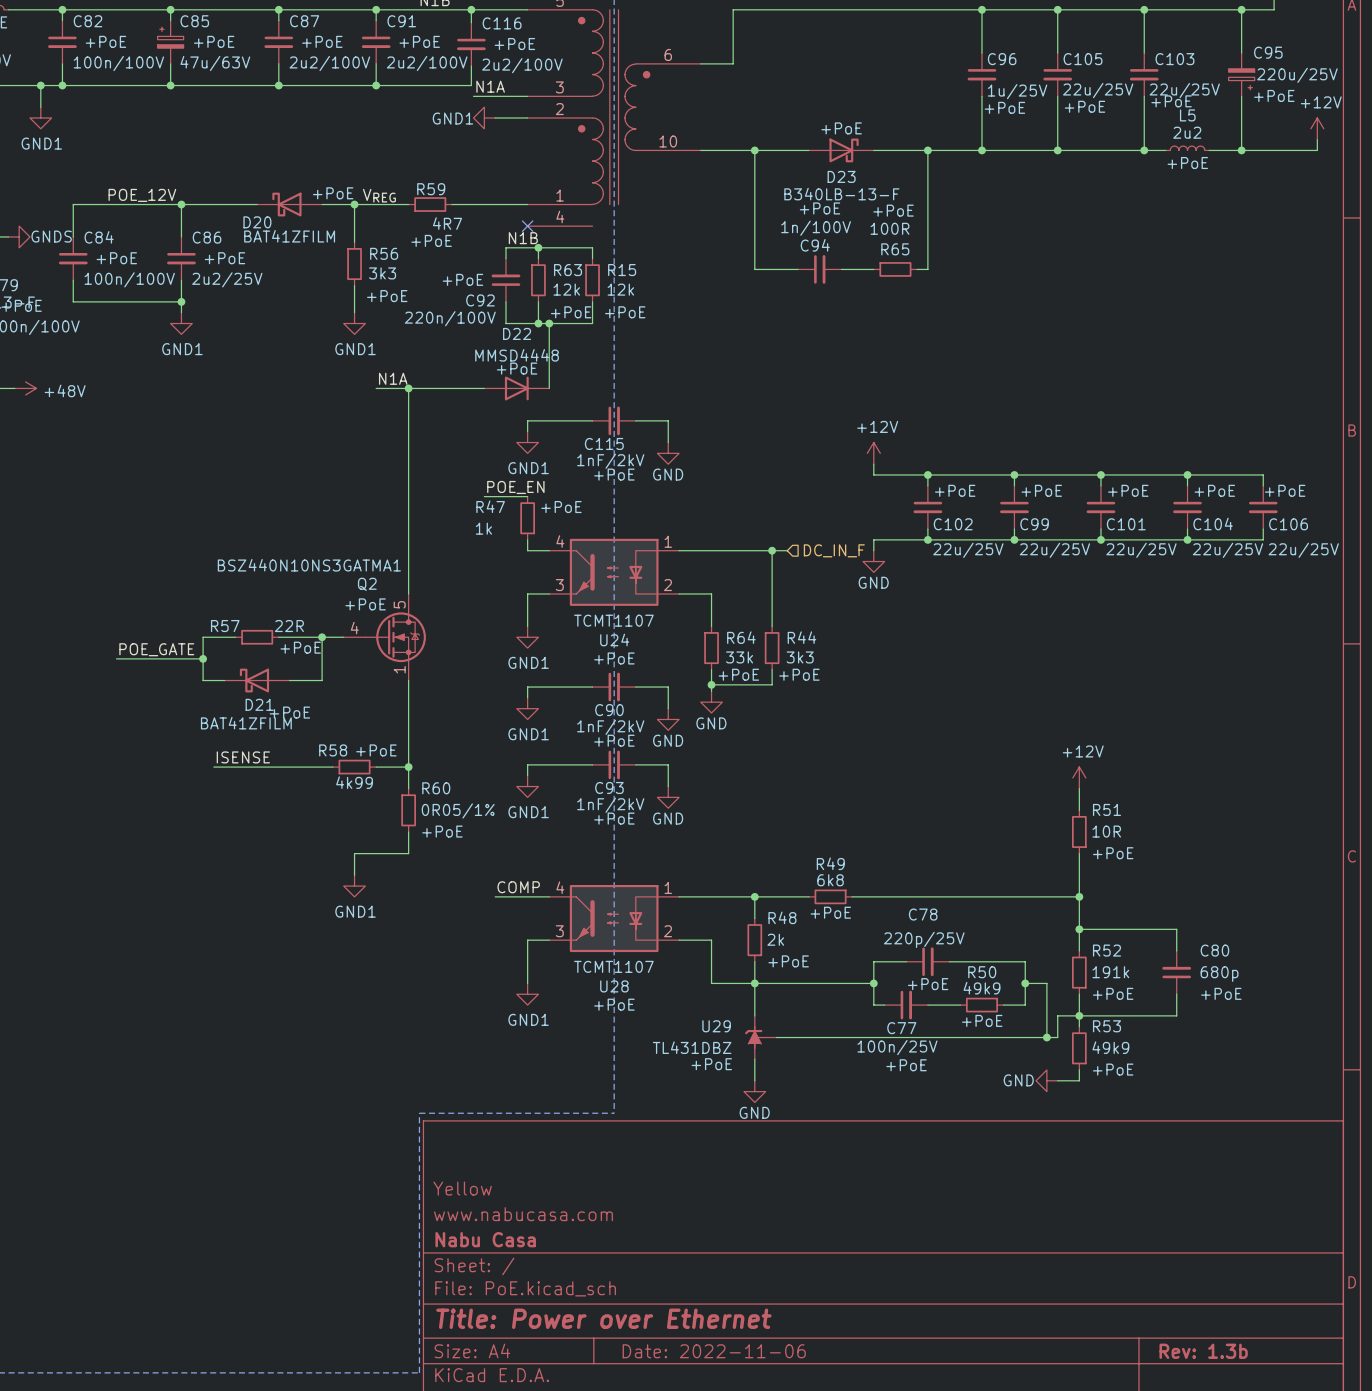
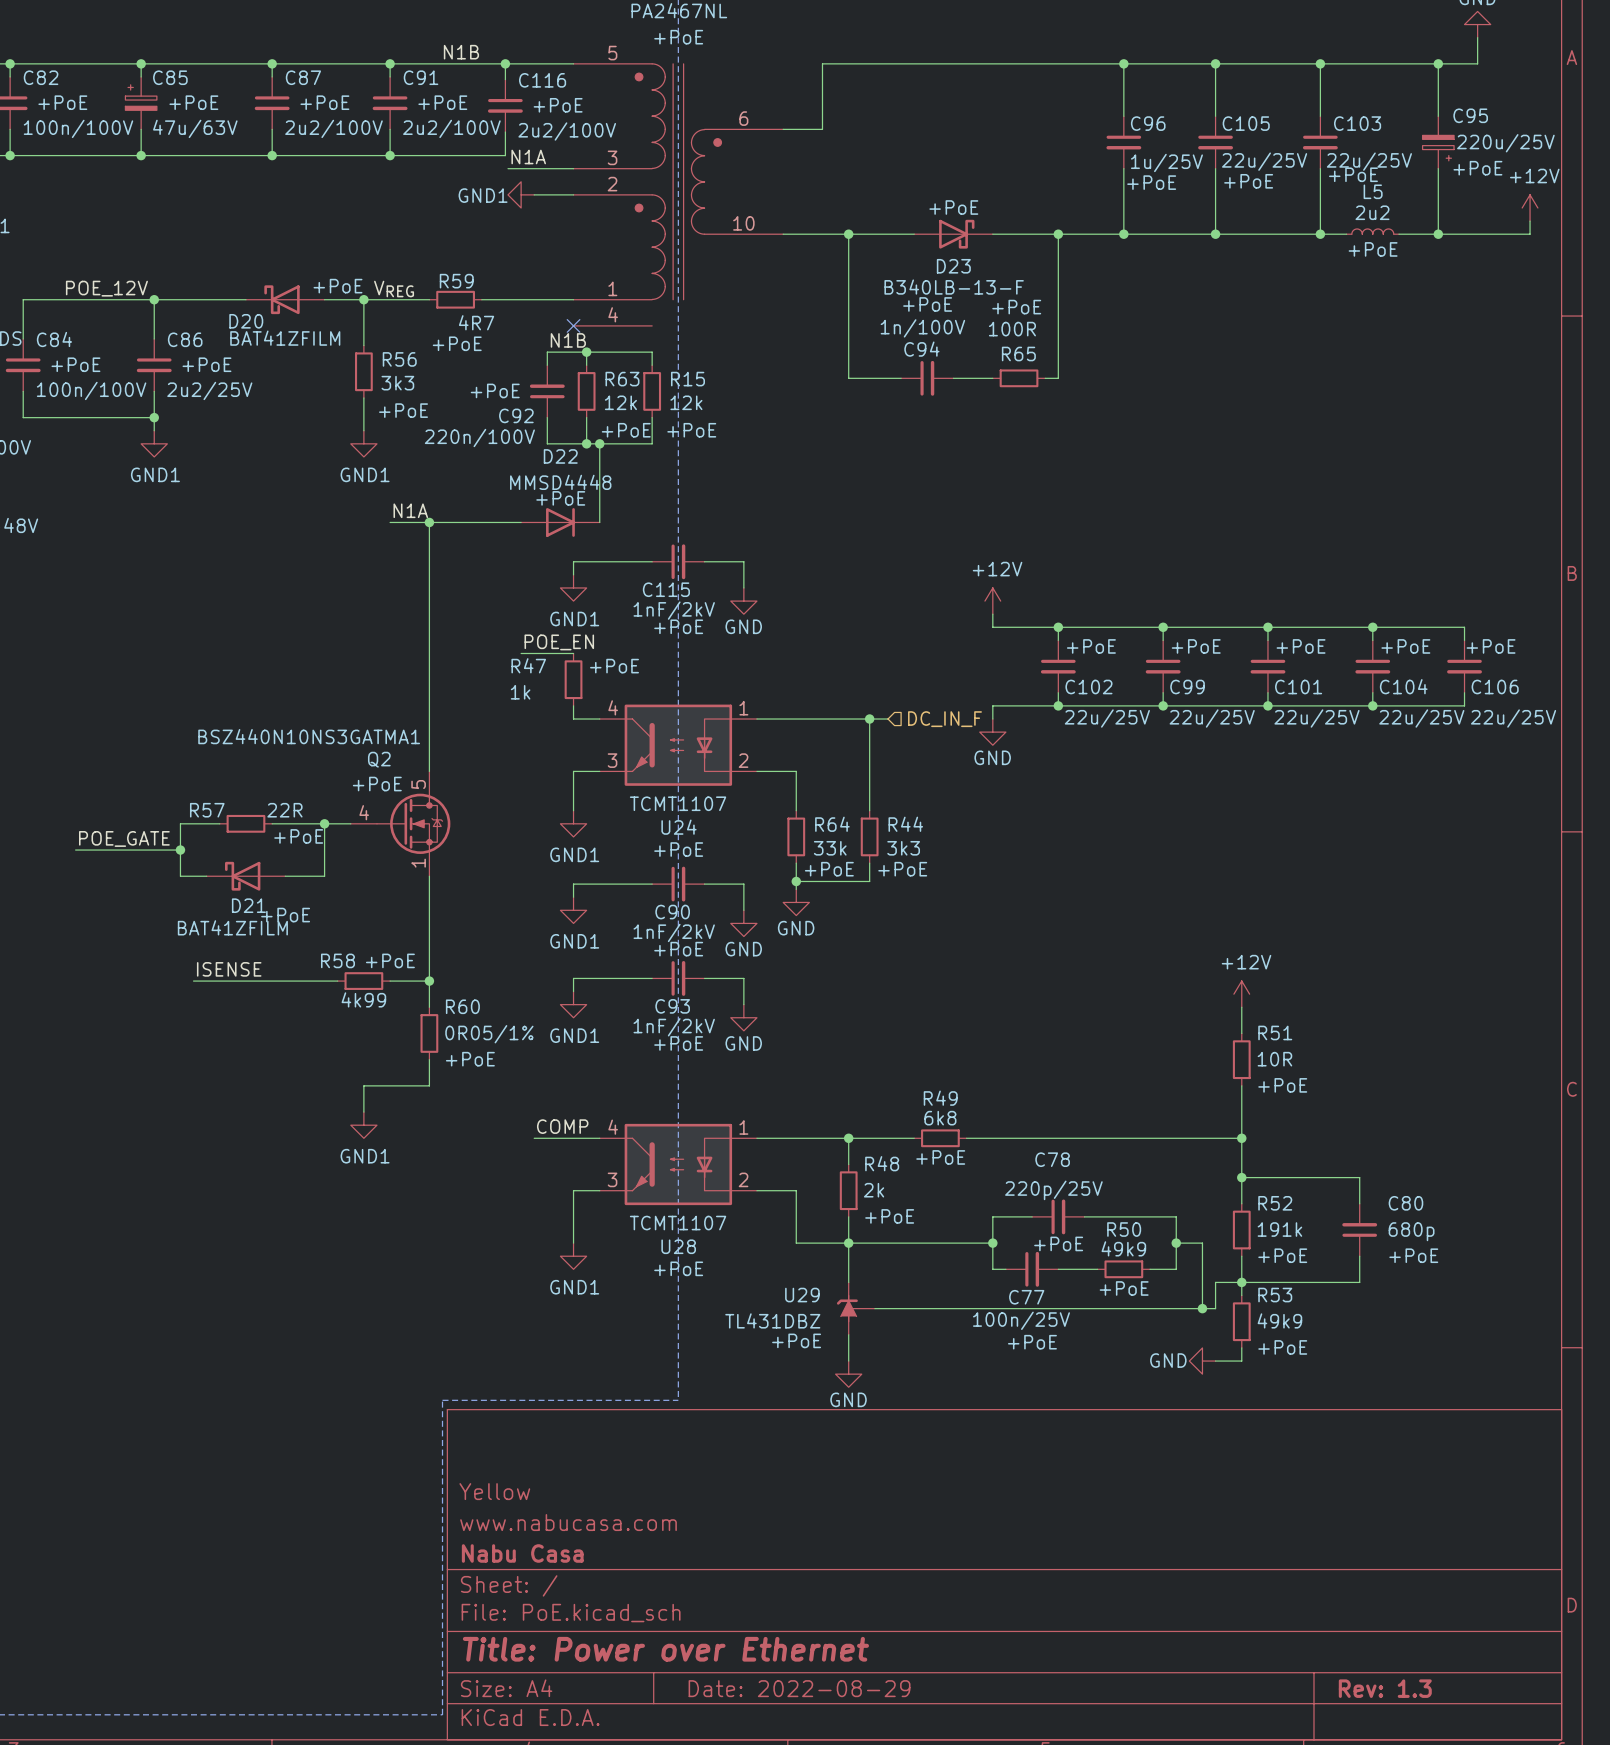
title block: Date: 2022-11-06 (714, 1351) -> Date: 2022-08-29 (799, 1688)
title block: Rev: 1.3b (1203, 1351) -> Rev: 1.3 (1385, 1688)

